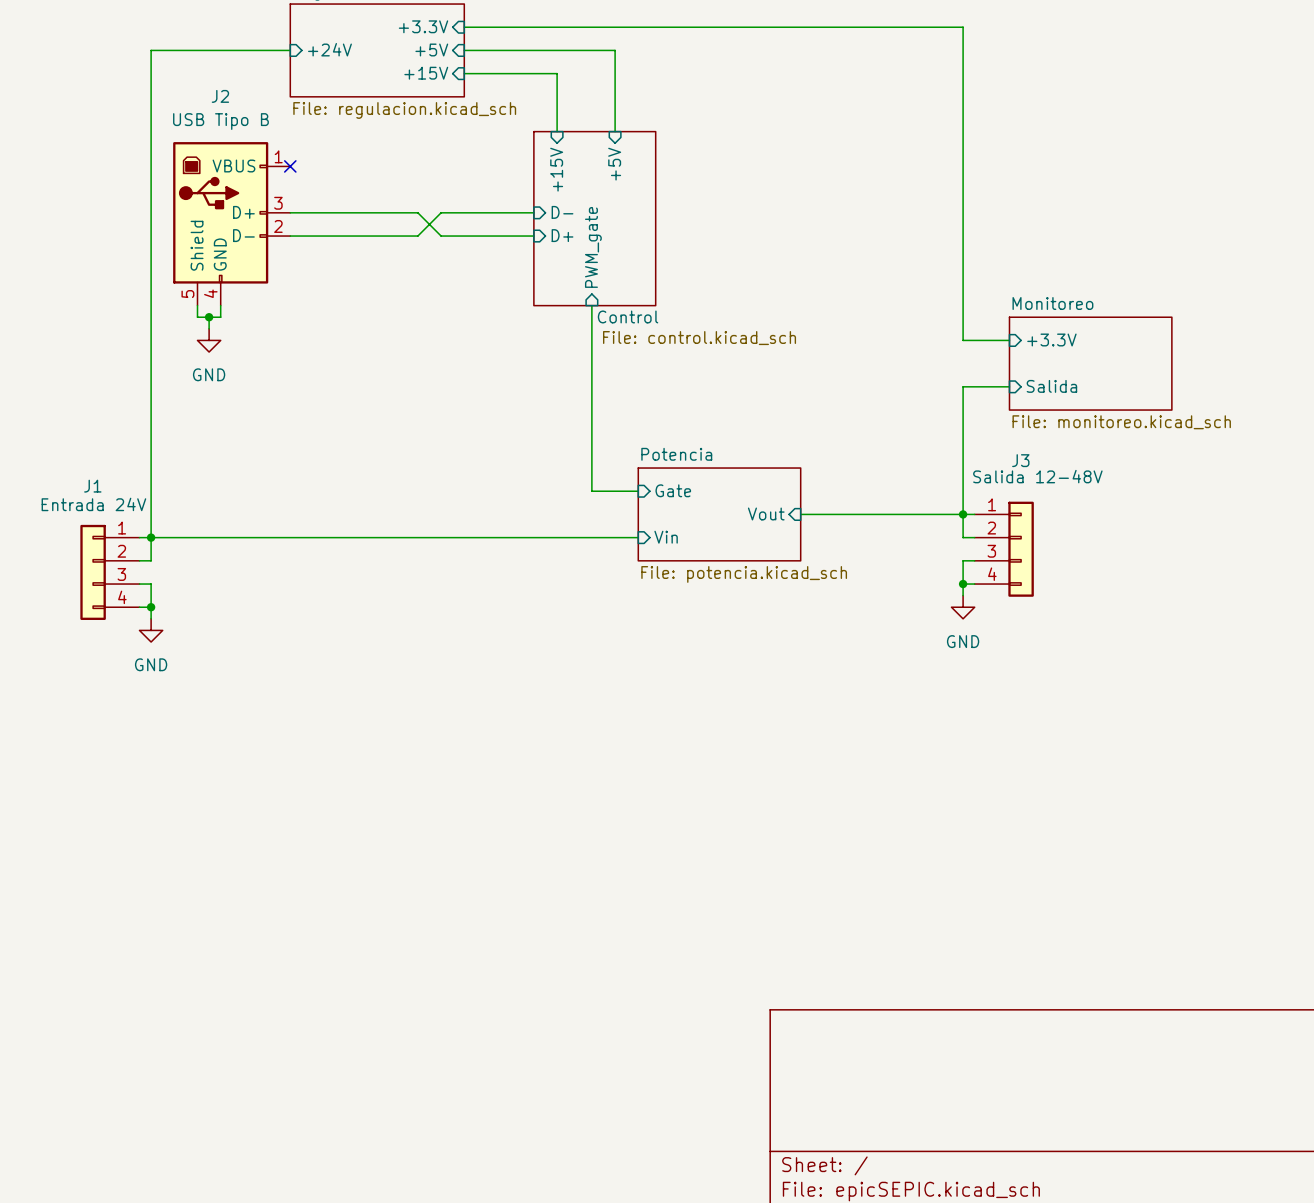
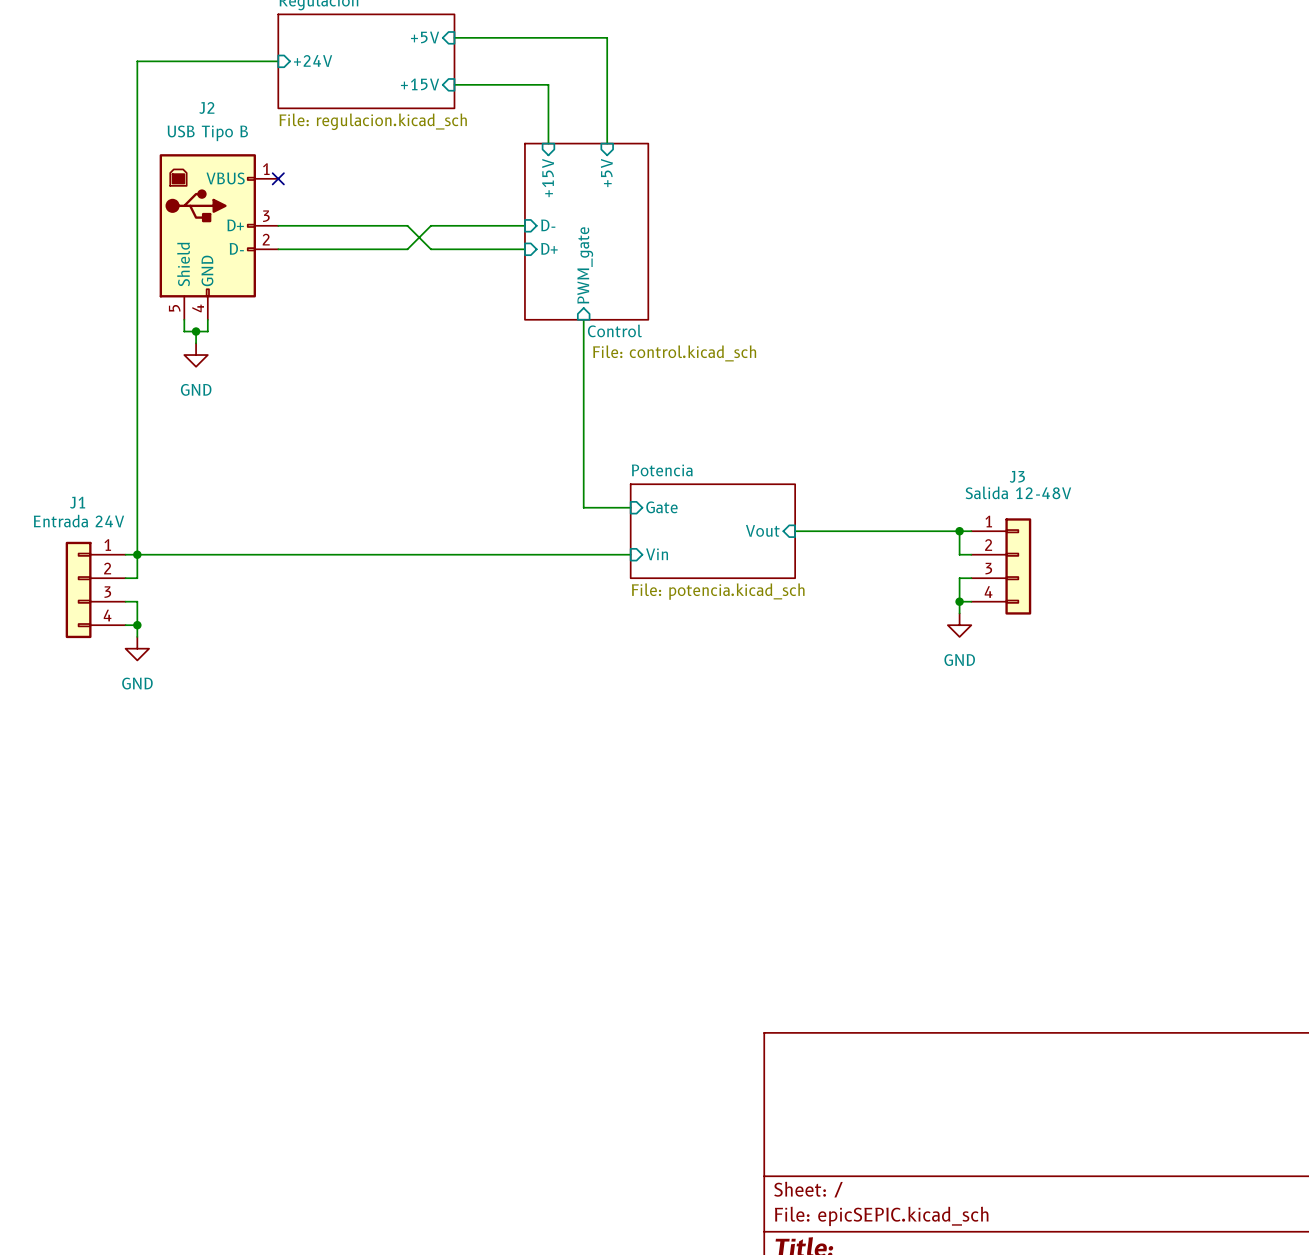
sheet pin: +3.3V (423, 26) -> +5V (425, 37)
wire: (615, 27) (963, 27) (963, 340) (1009, 340) -> none
sheet pin: +5V (431, 50) -> none
wire: (464, 50) (615, 50) -> (607, 37) (607, 61)
sheet pin: +3.3V (1051, 339) -> none
sheet Monitoreo: File: monitoreo.kicad_sch (1090, 363) -> none
wire: (1009, 386) (963, 386) (963, 514) -> none
sheet pin: Salida (1051, 386) -> none
J3 value position: Salida 12-48V (1037, 476) -> Salida 12-48V (1018, 492)

